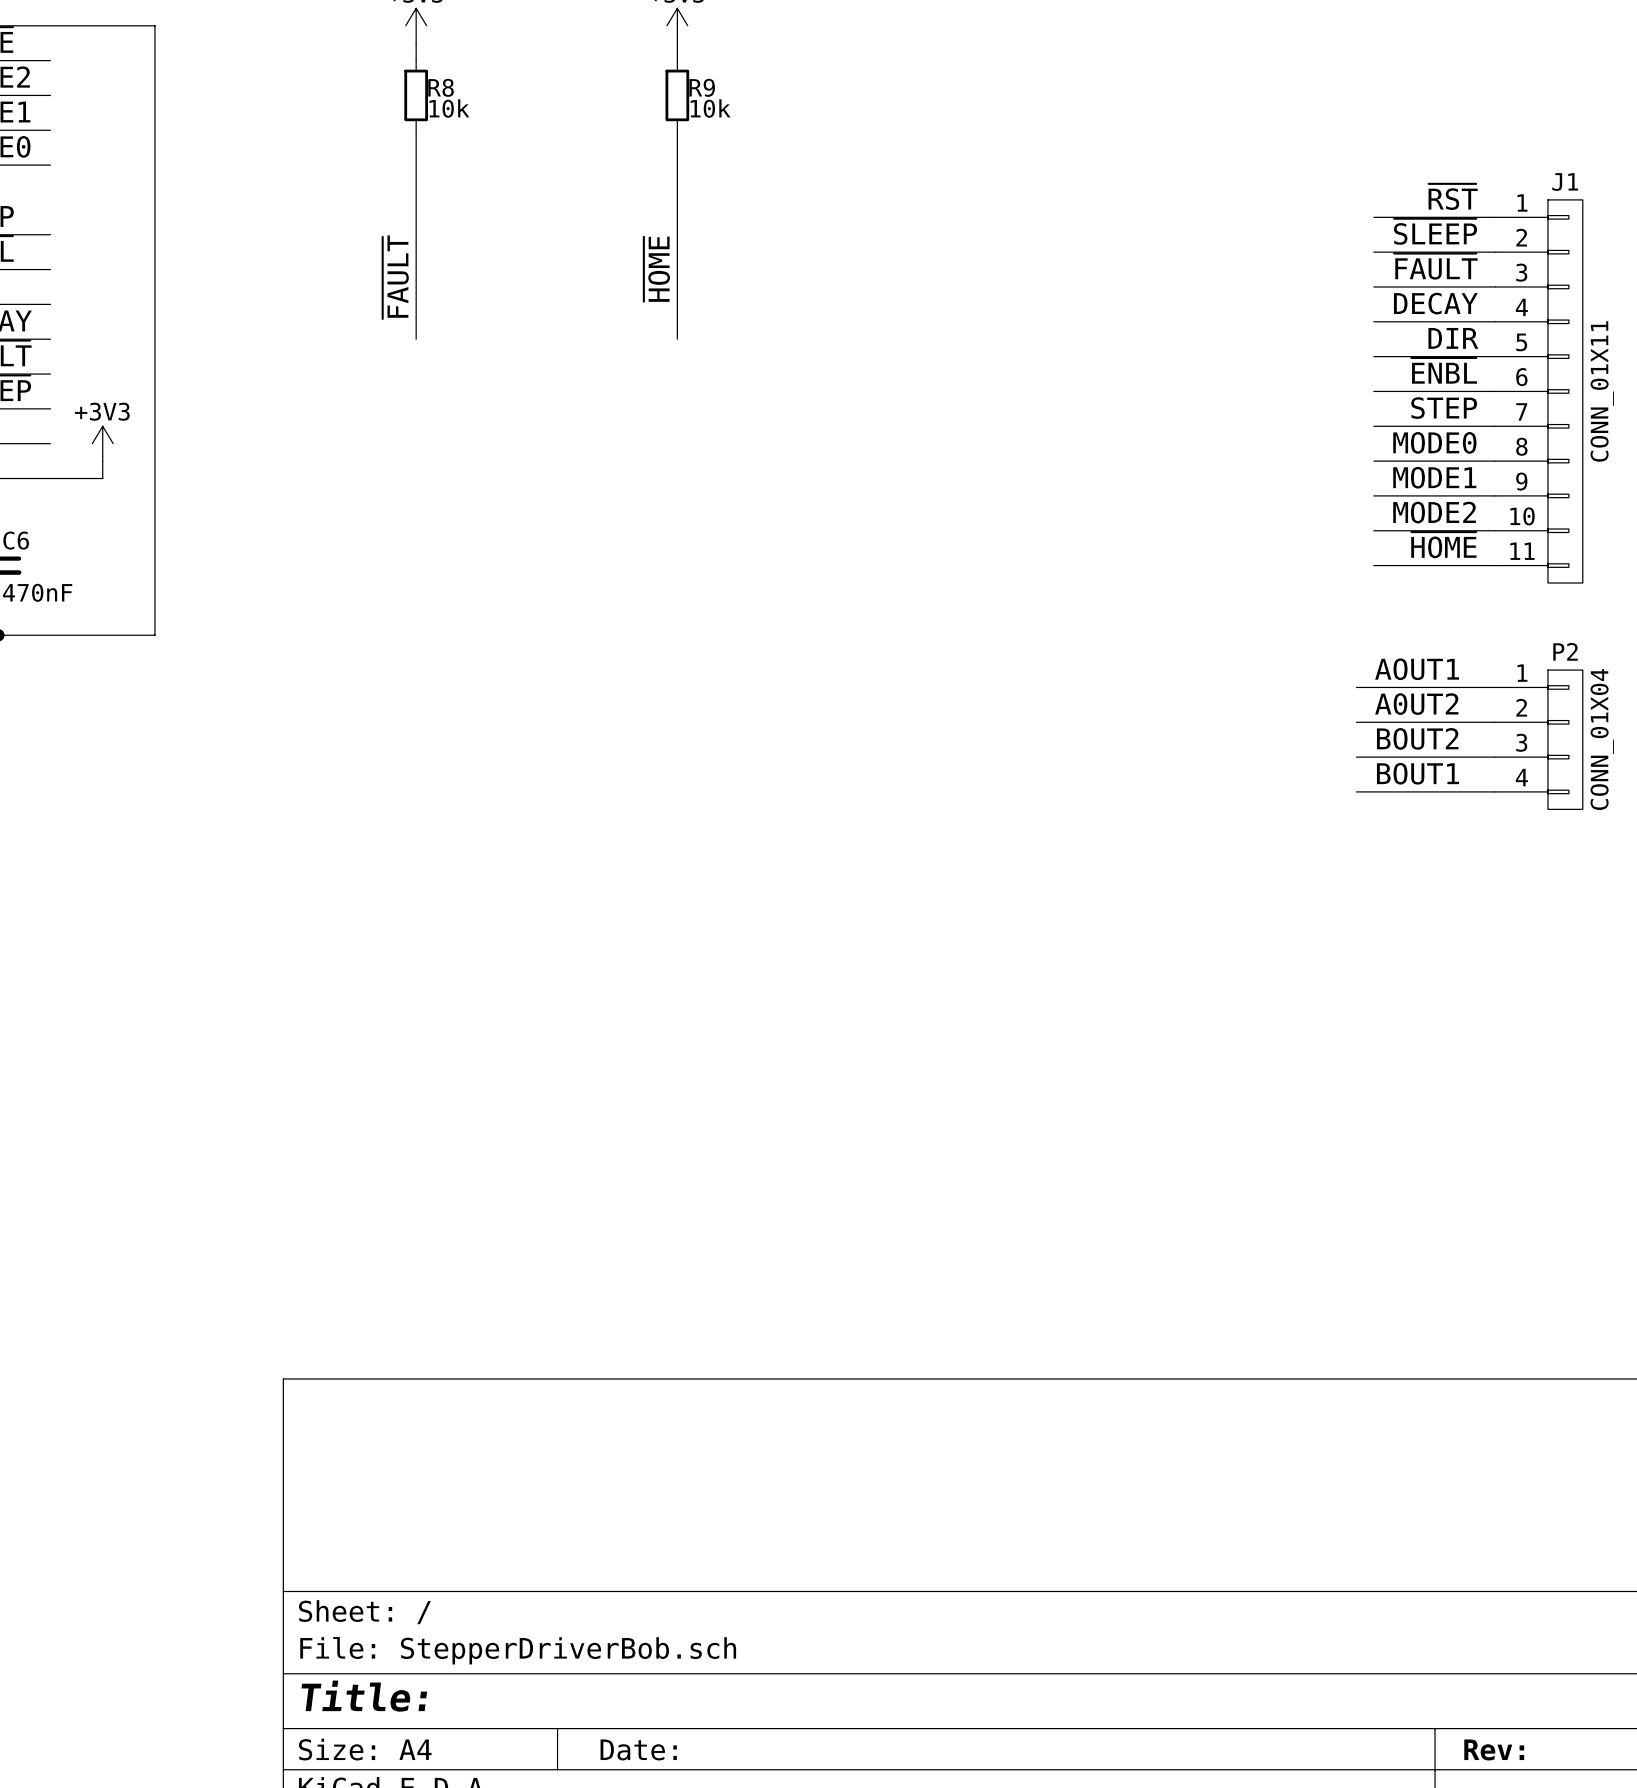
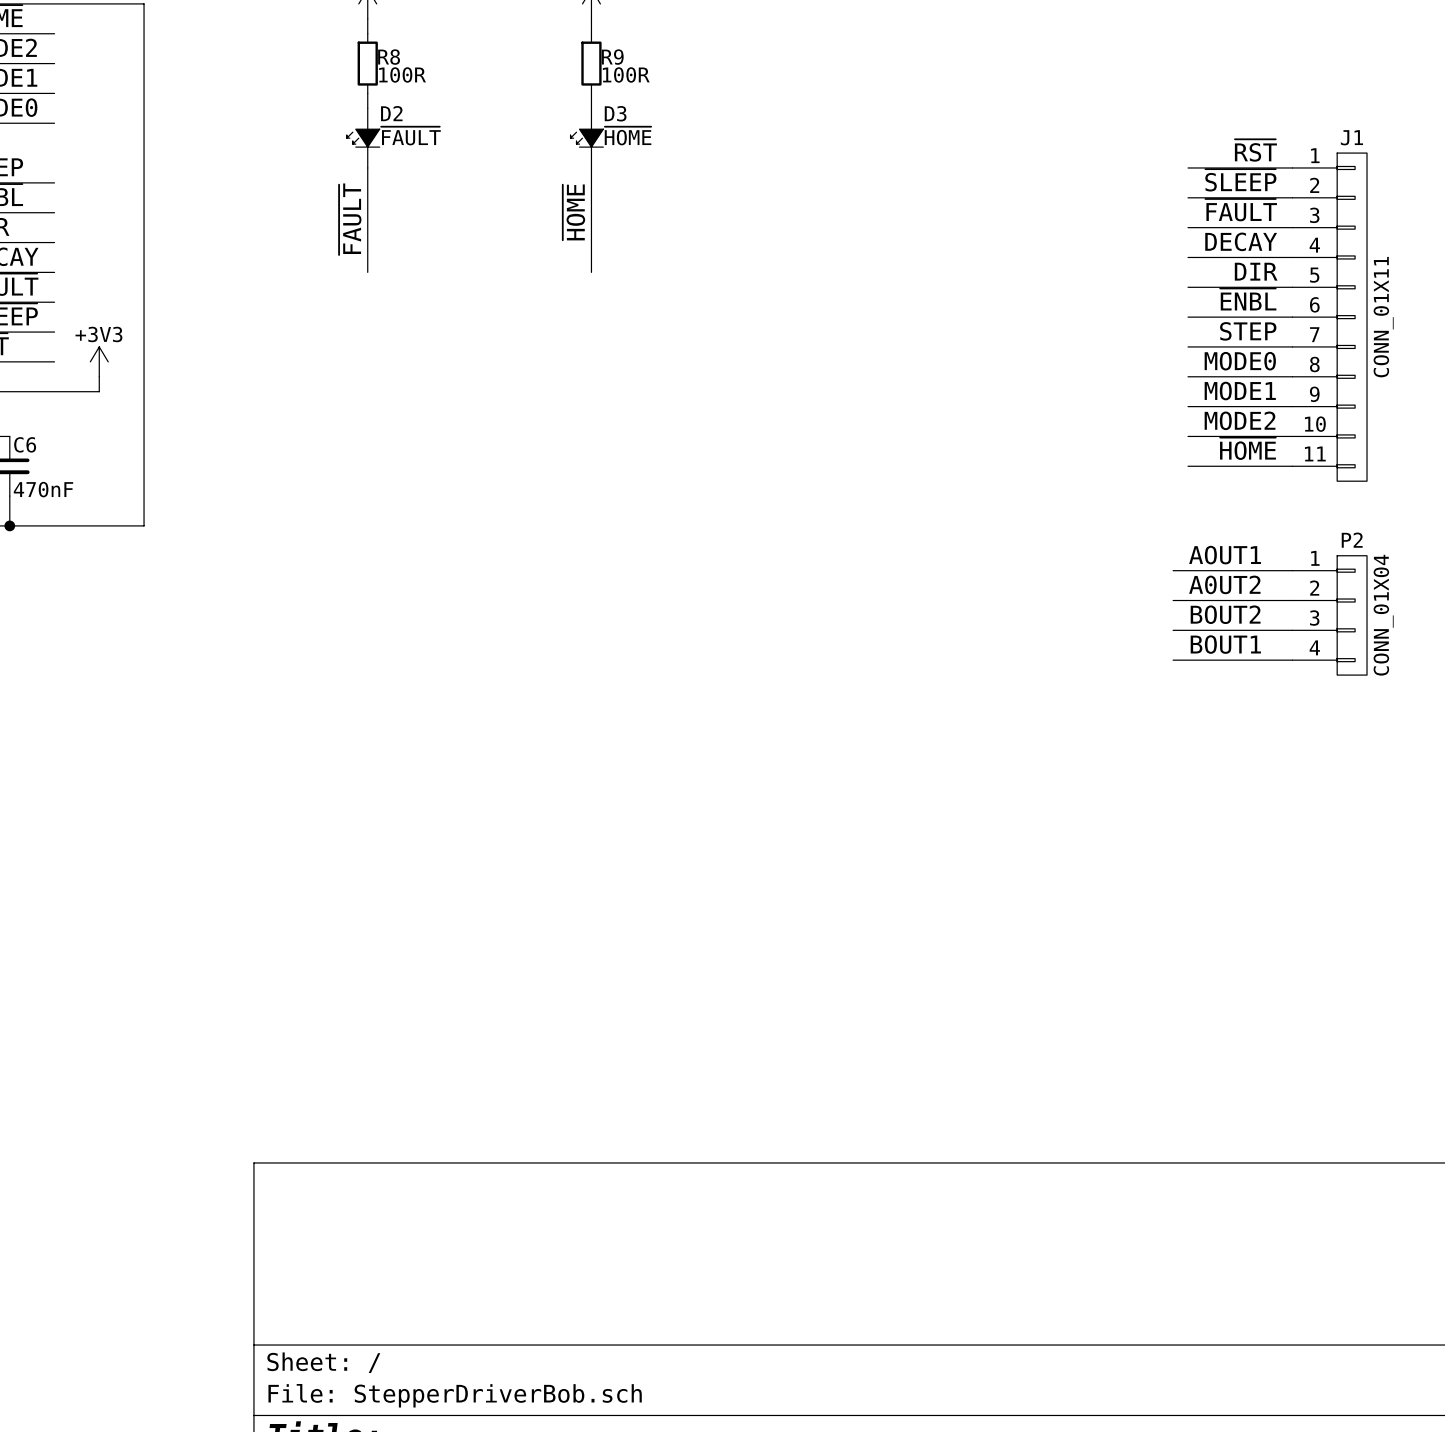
R8 value: 10k (449, 108) -> 100R (402, 74)
R9 value: 10k (710, 108) -> 100R (626, 74)
D2: none -> ~{FAULT} (363, 138)
D3: none -> ~{HOME} (586, 138)

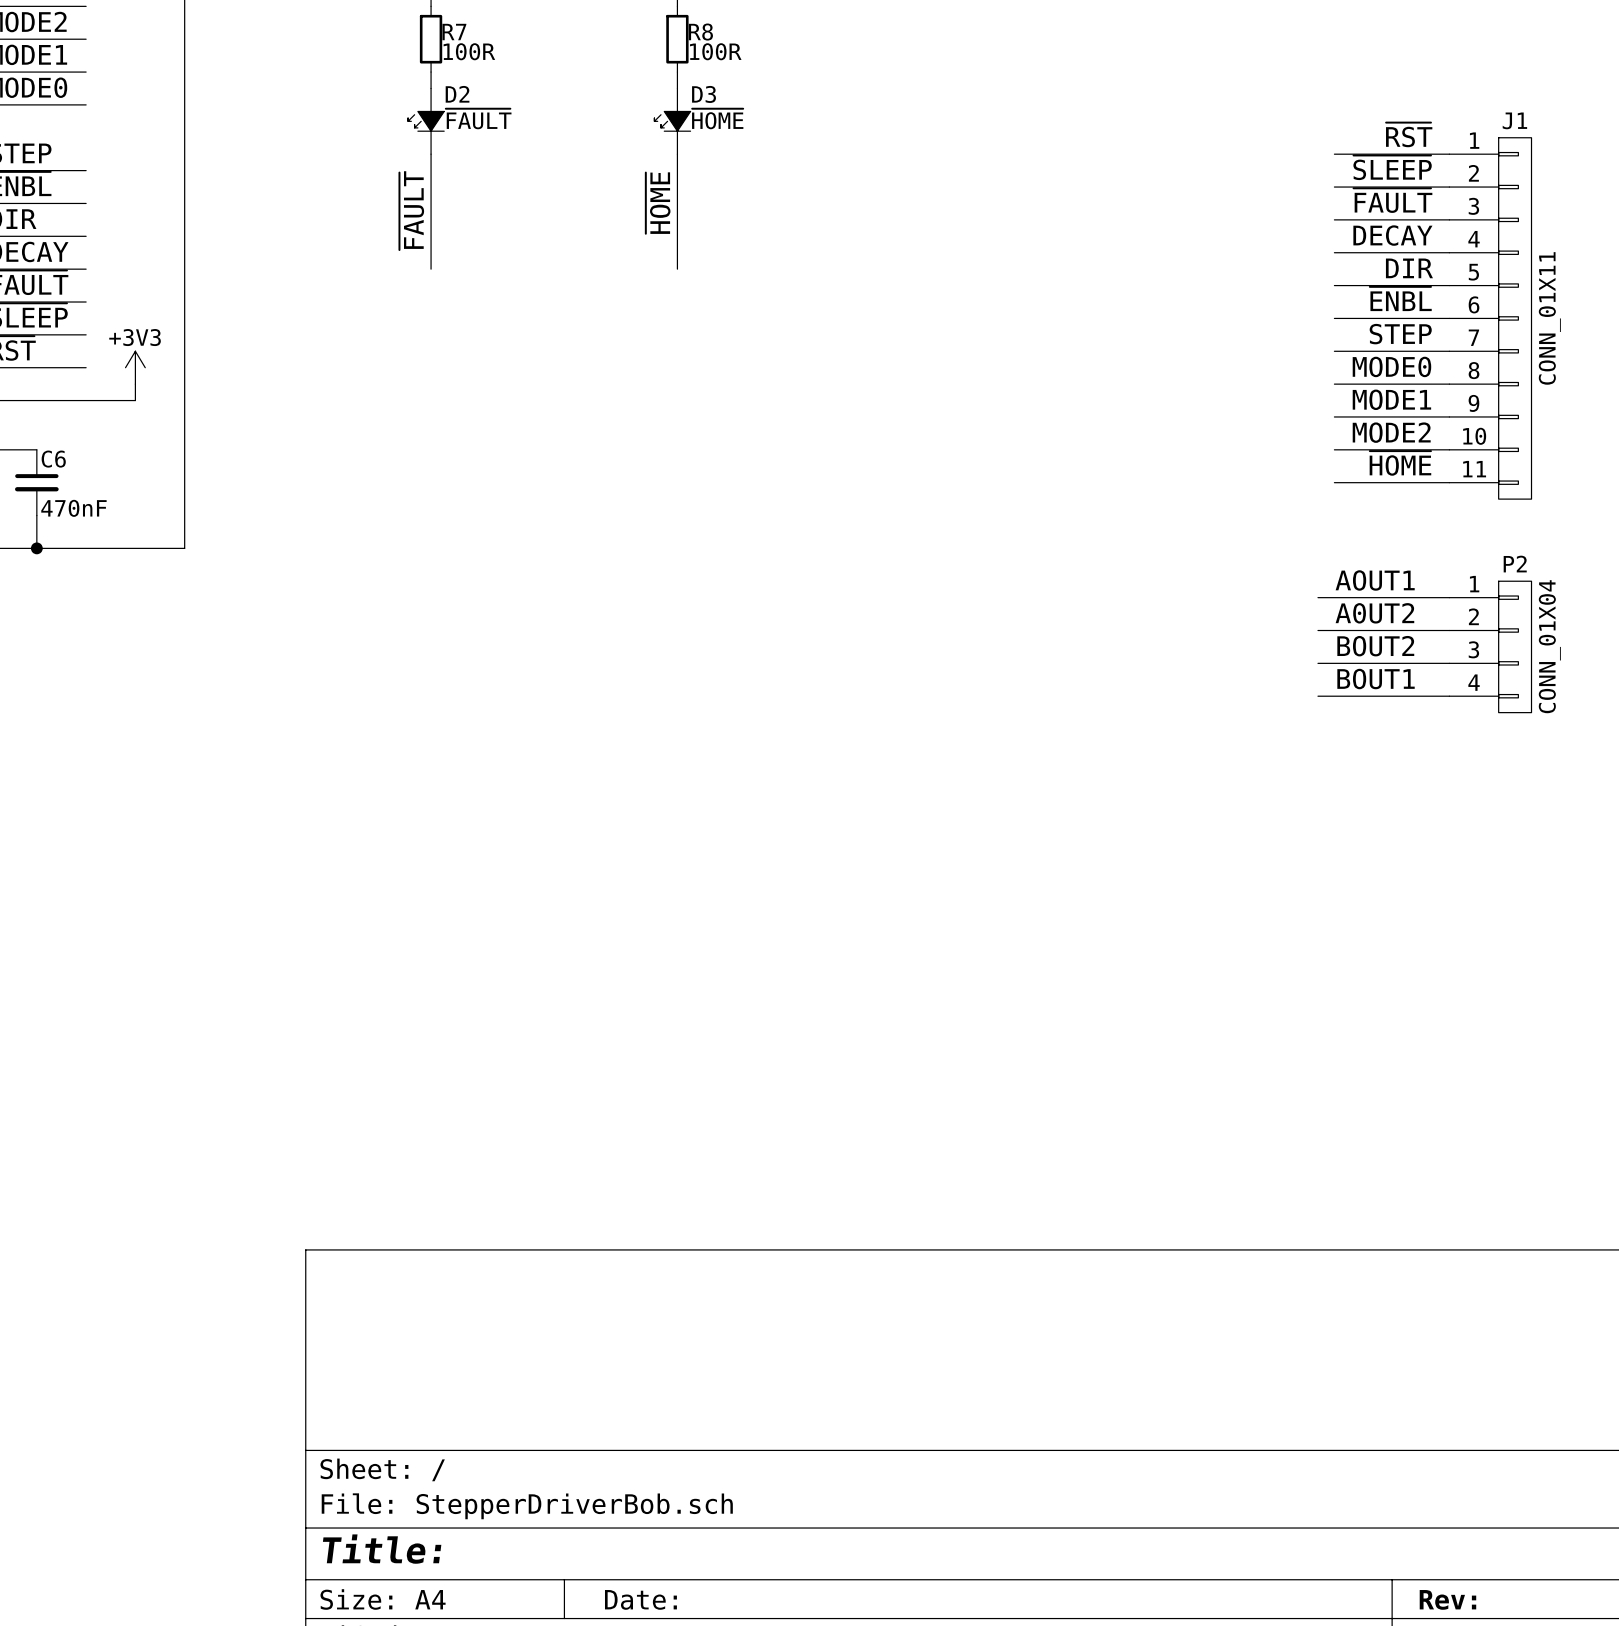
R8 name: R8 (389, 57) -> R7 (454, 32)
R9 name: R9 (612, 57) -> R8 (700, 32)

